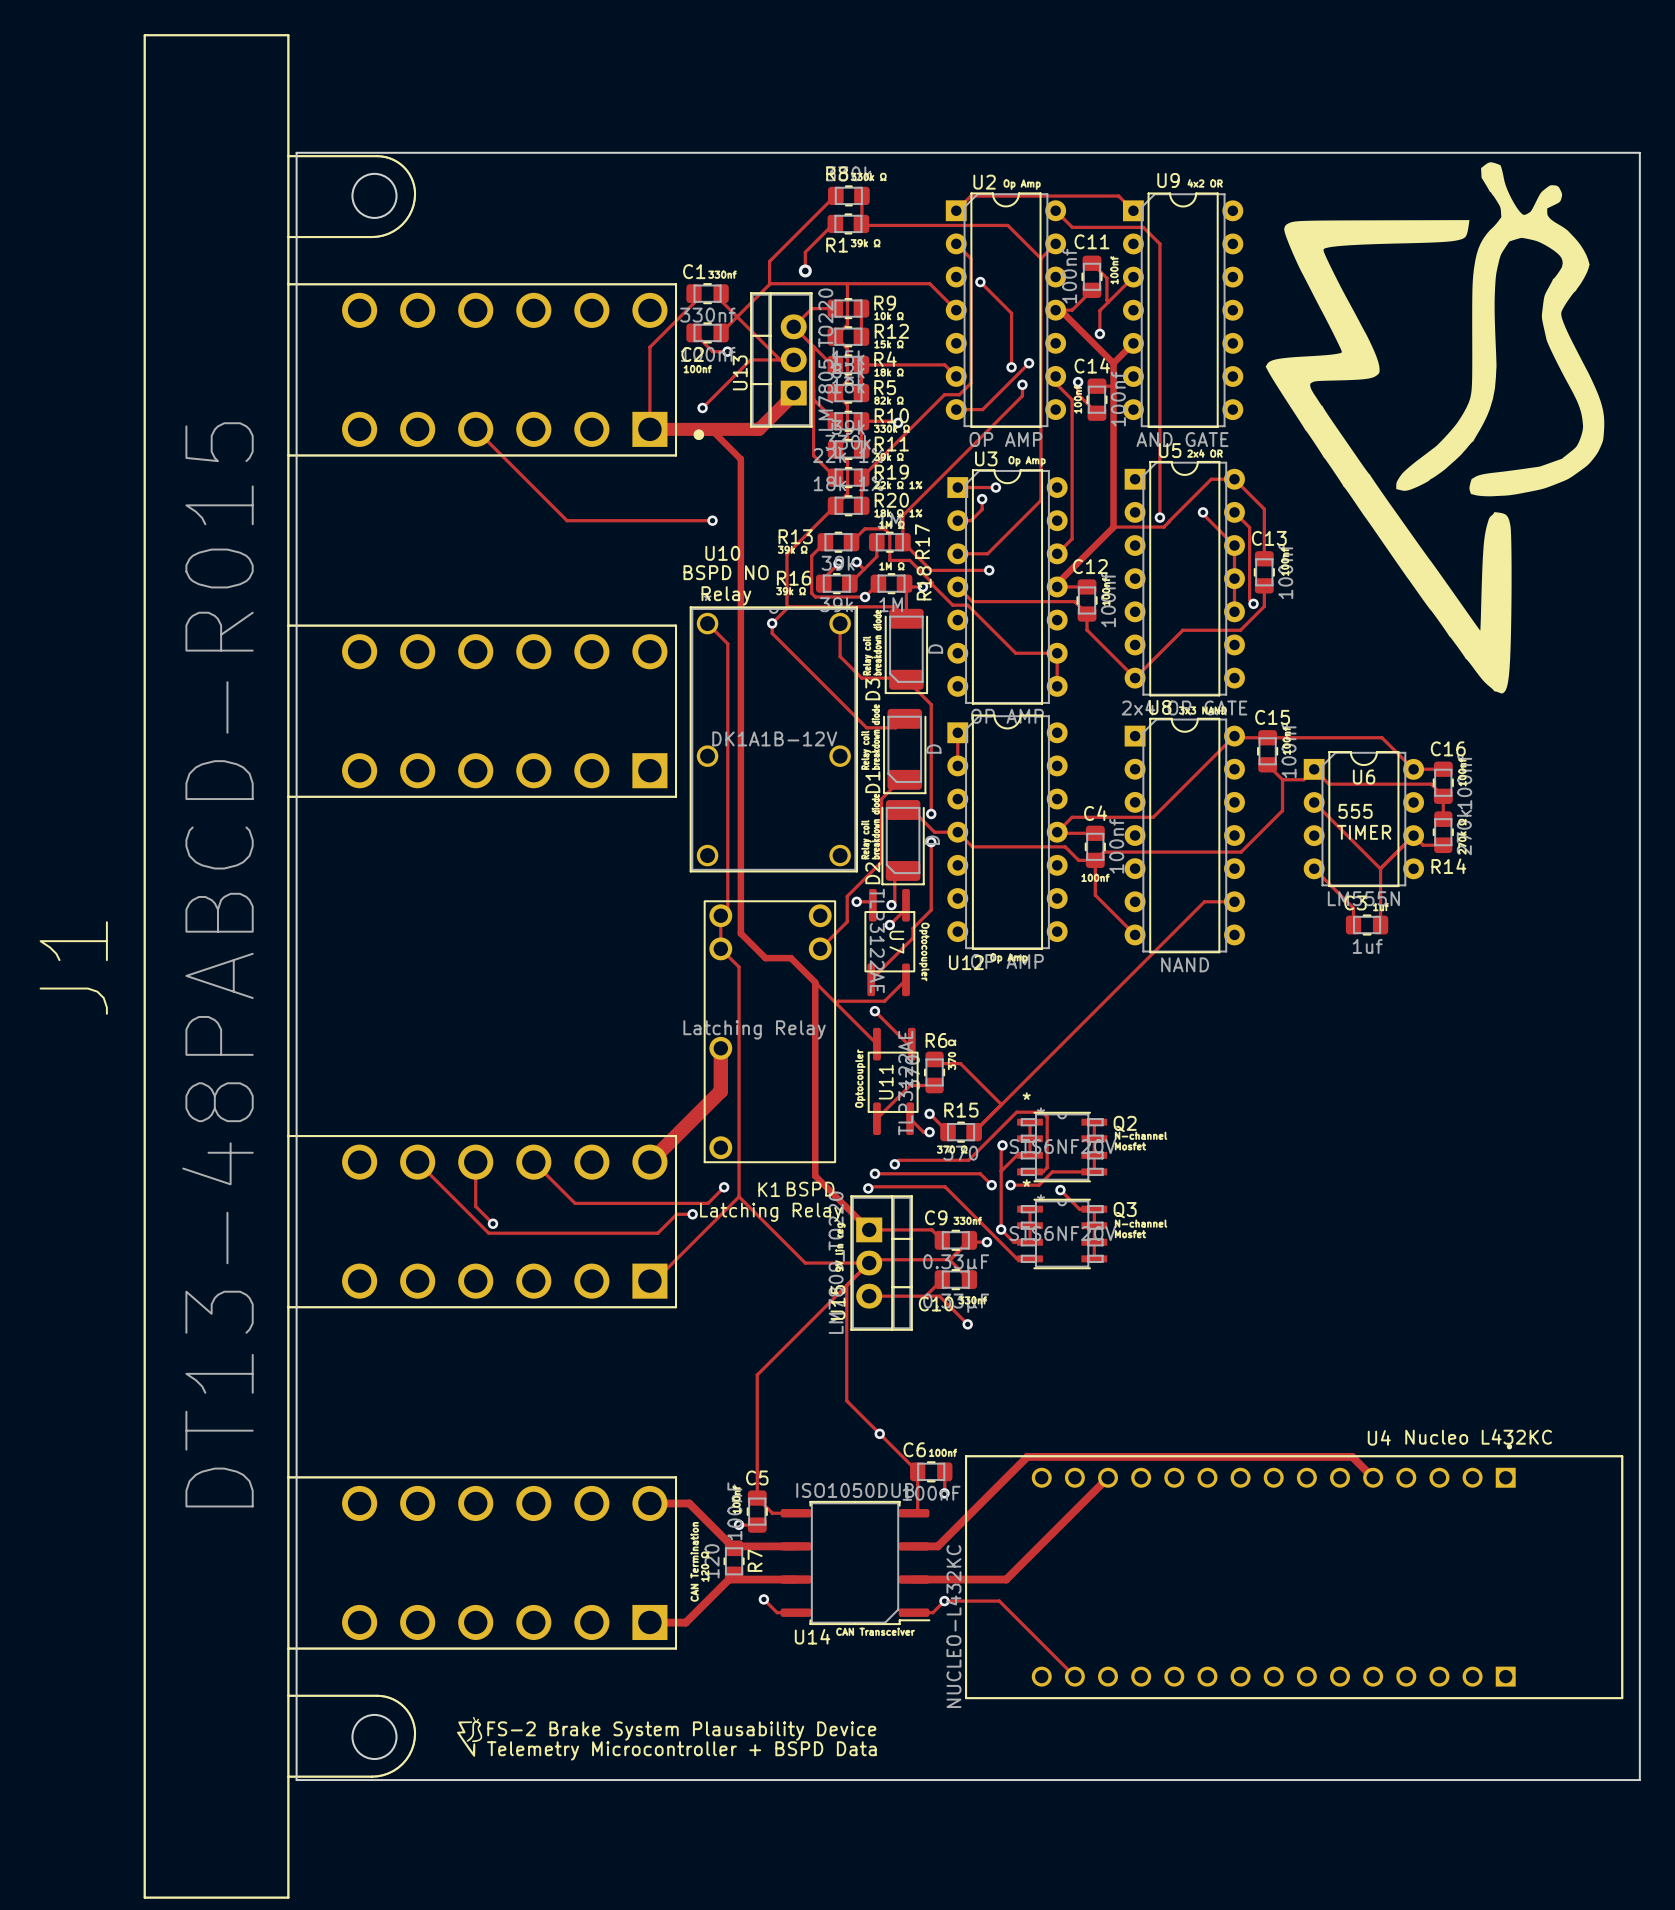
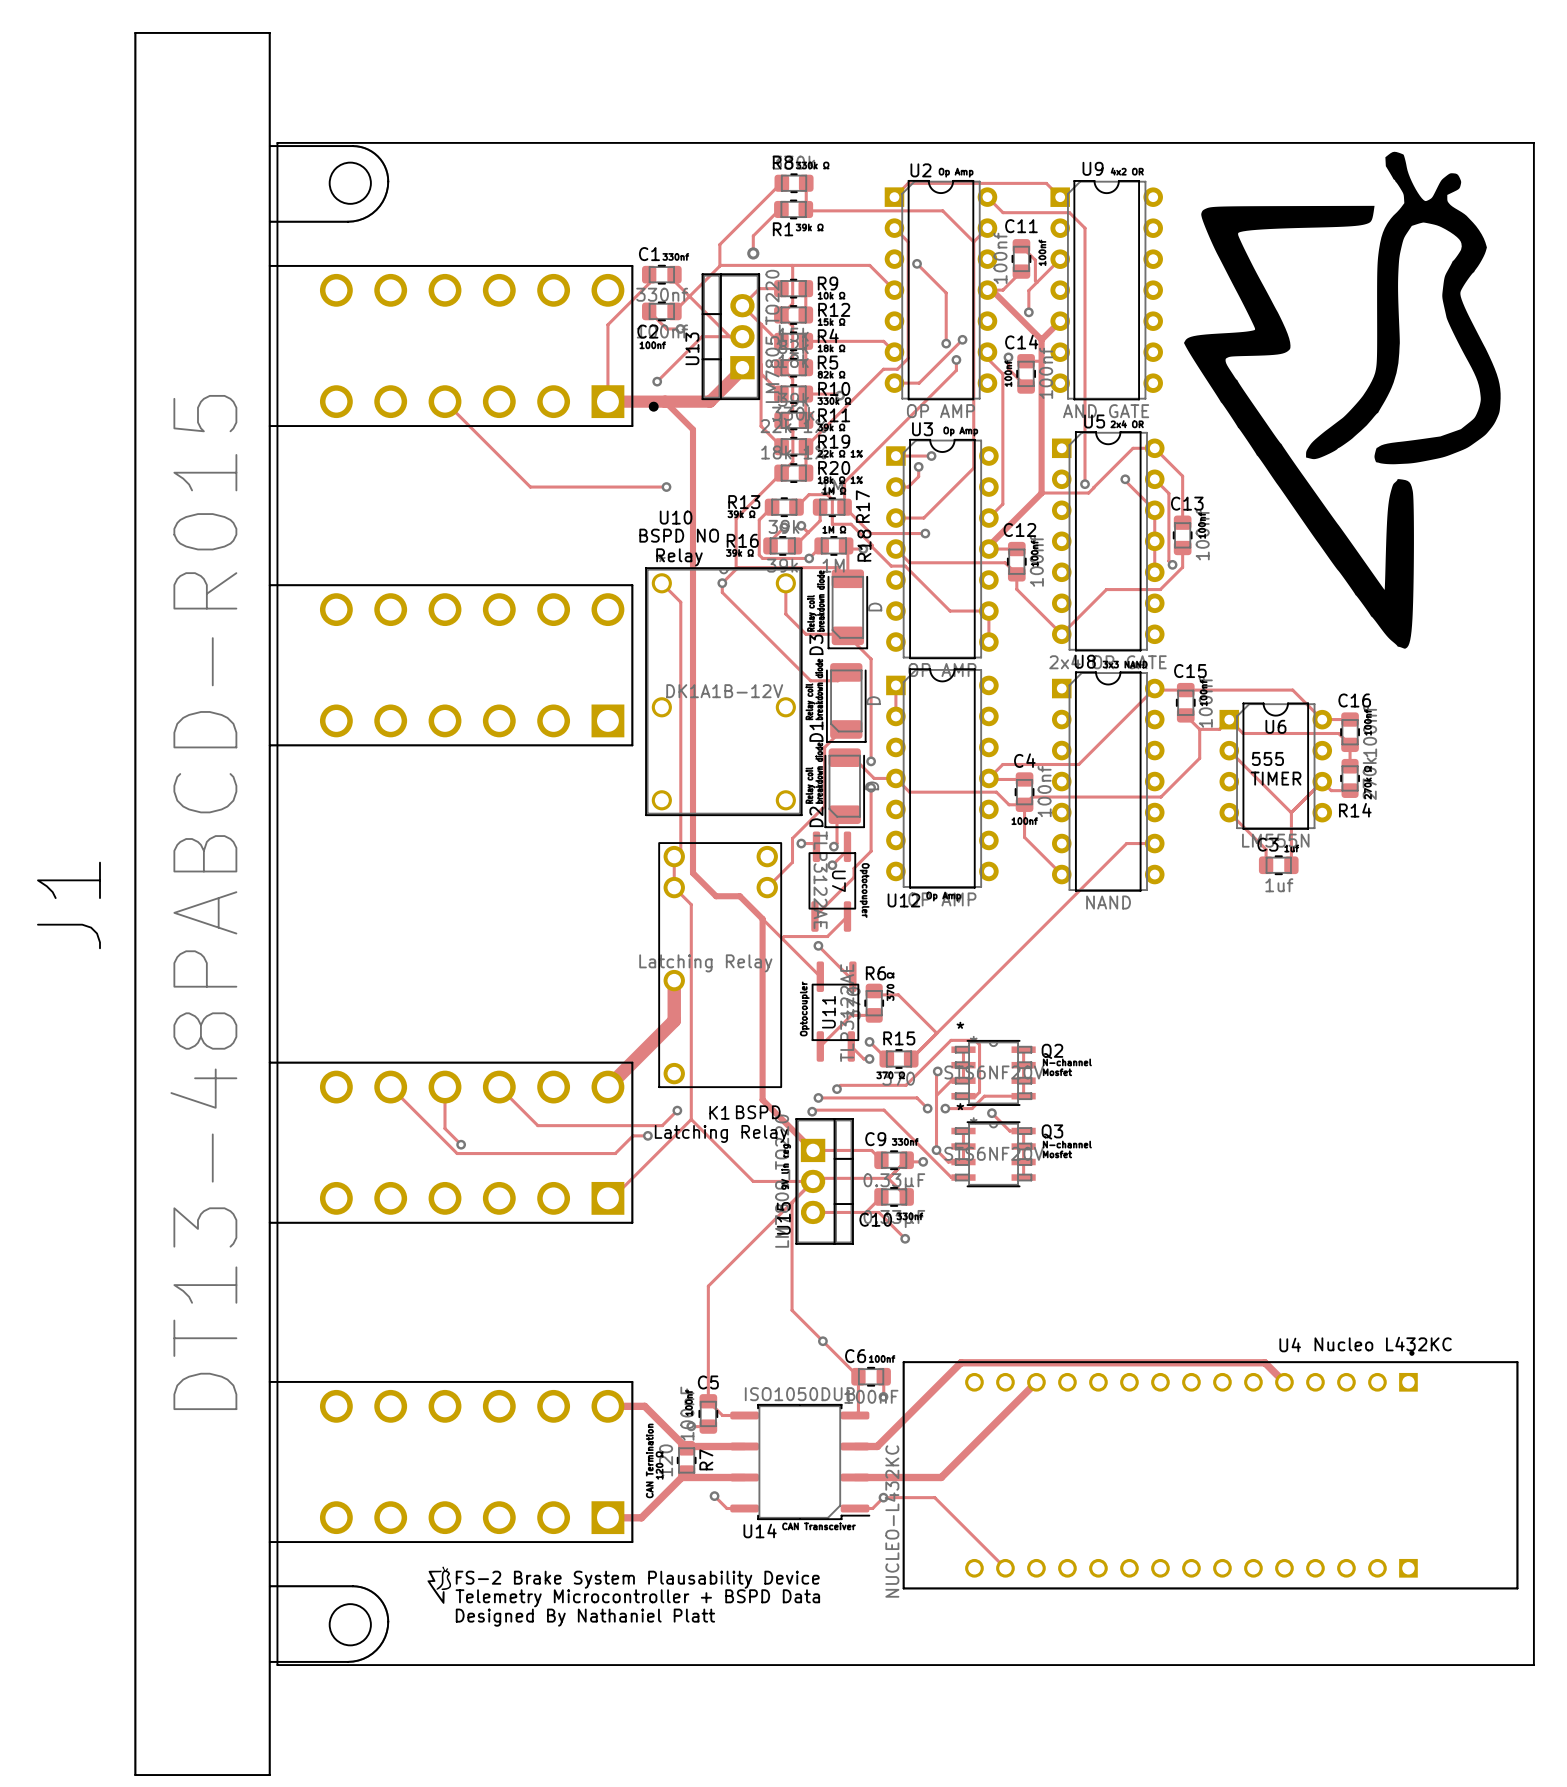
text: none -> FS-2 Brake System Plausability Device (637, 1579)
text: FS-2 Brake System Plausability Device (681, 1731) -> Designed By Nathaniel Platt (585, 1617)
drawing position: (469, 1736) -> (439, 1585)
text position: Telemetry Microcontroller + BSPD Data (681, 1750) -> Telemetry Microcontroller + BSPD Data (637, 1598)

